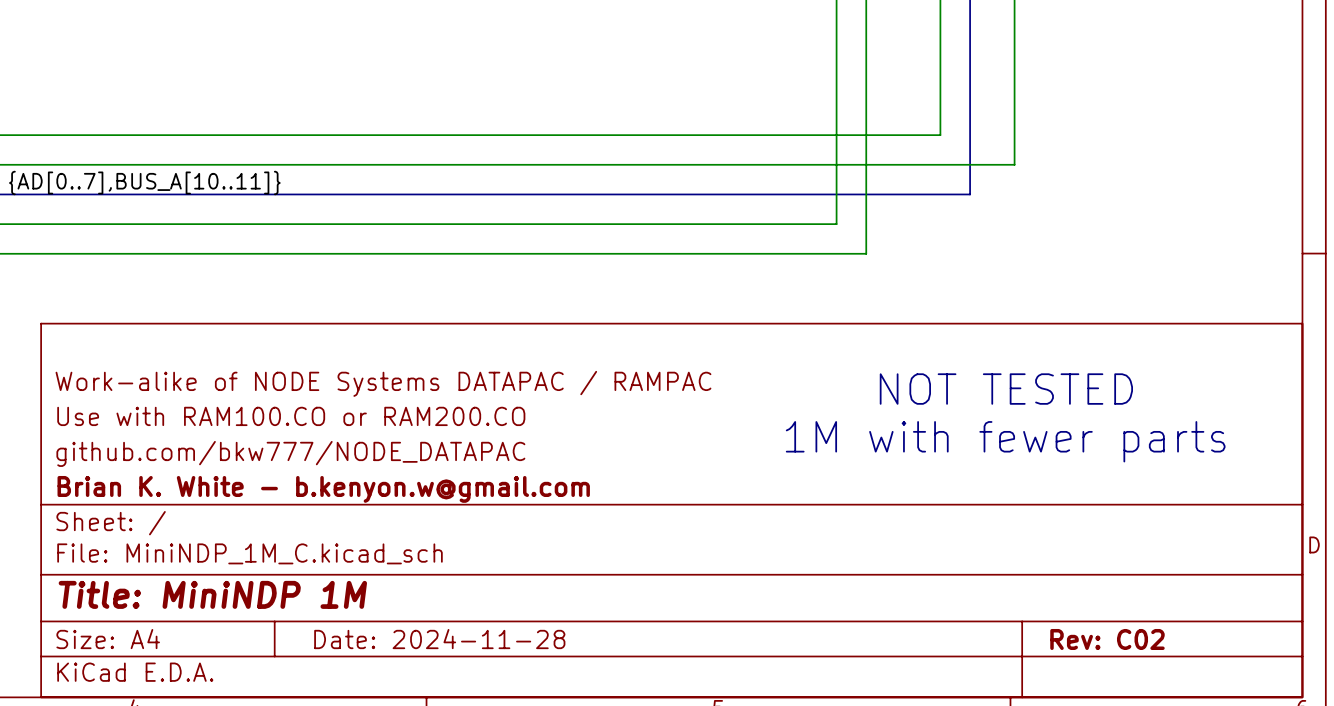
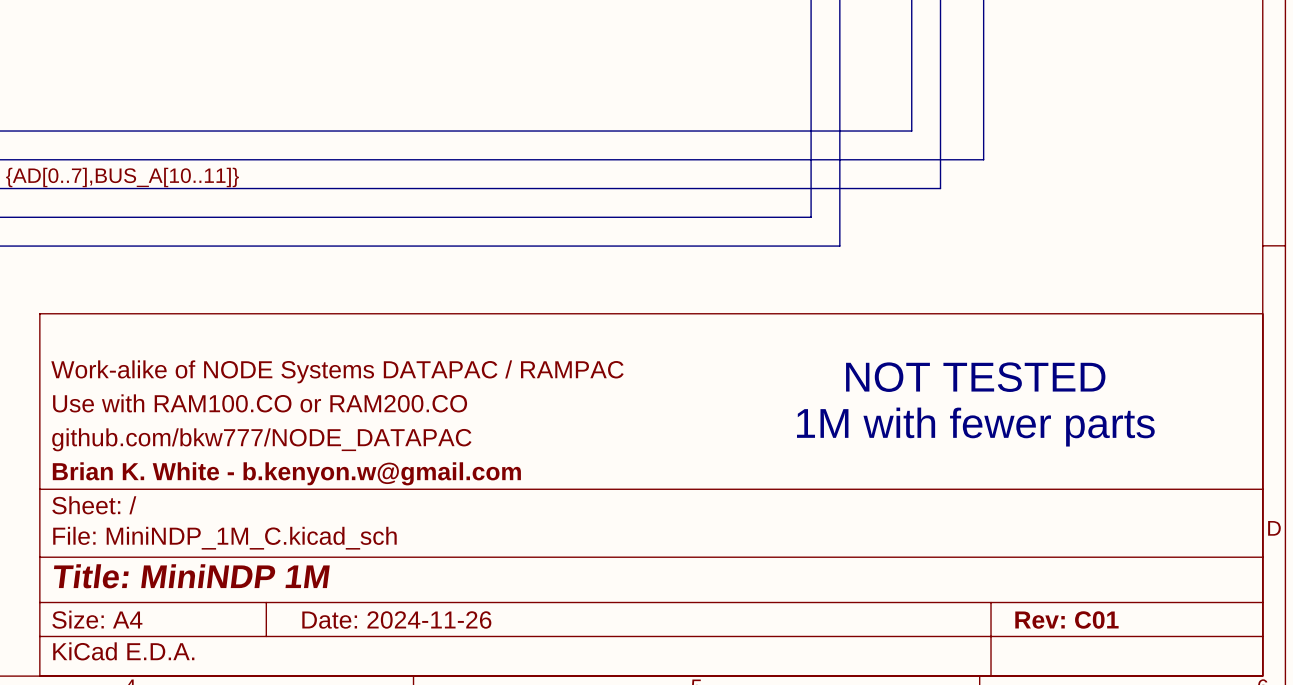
title block: Date: 2024-11-28 (439, 639) -> Date: 2024-11-26 (396, 619)
title block: Rev: C02 (1107, 639) -> Rev: C01 (1066, 619)

